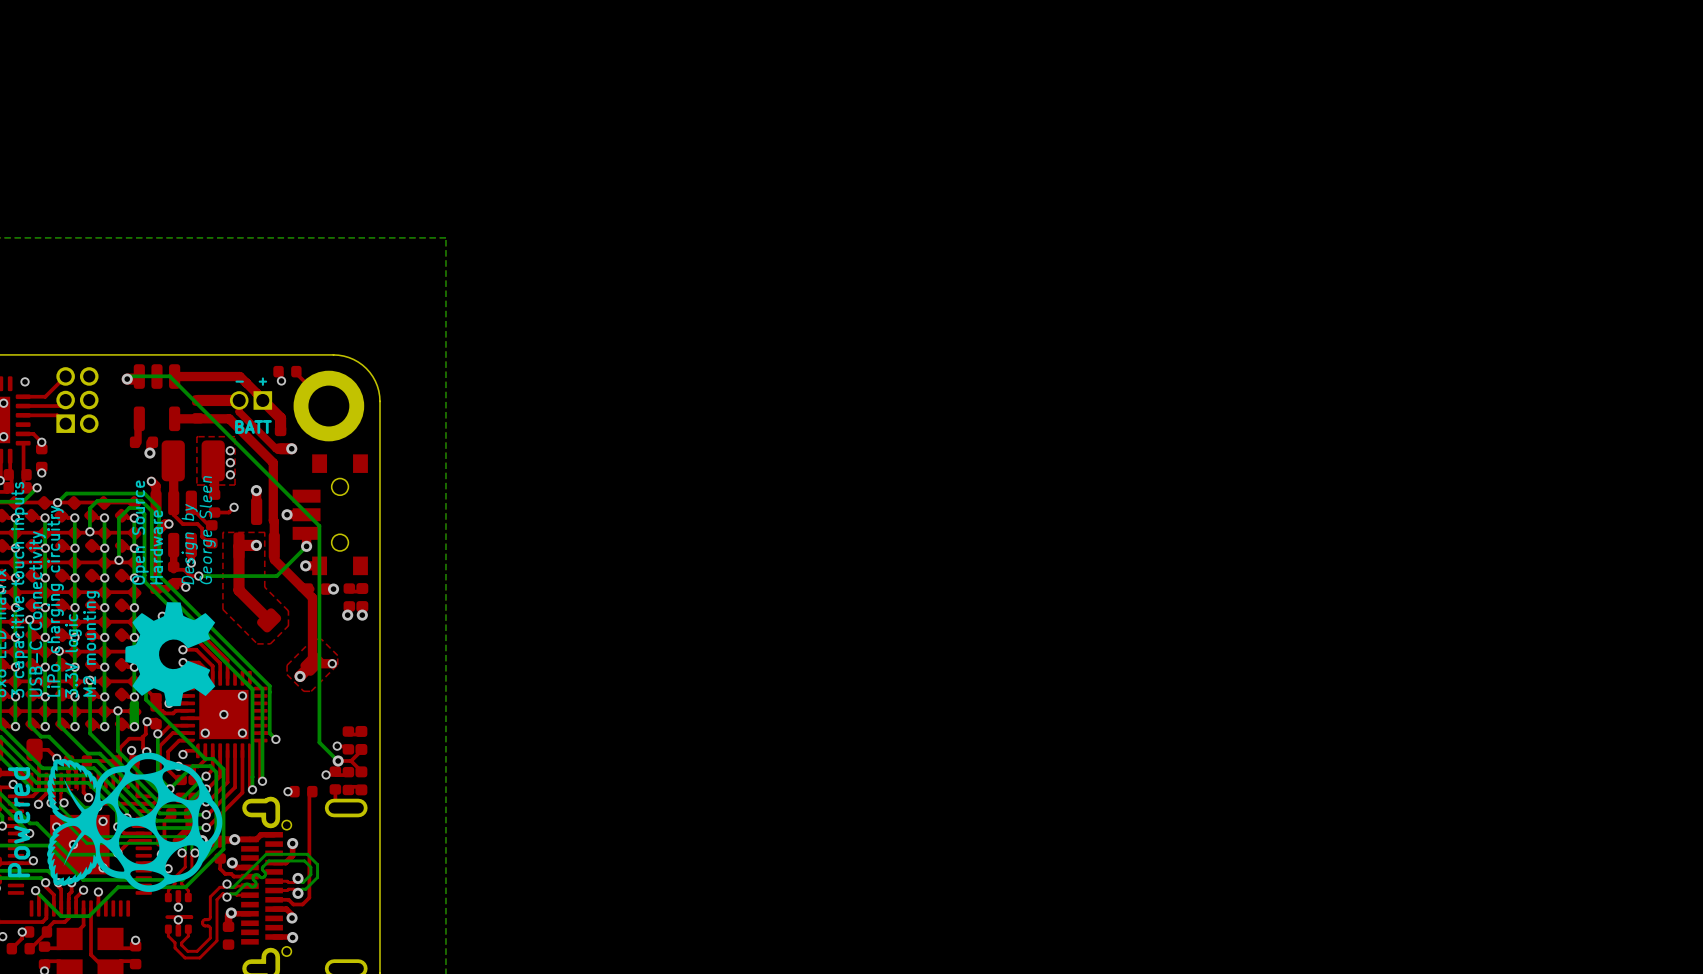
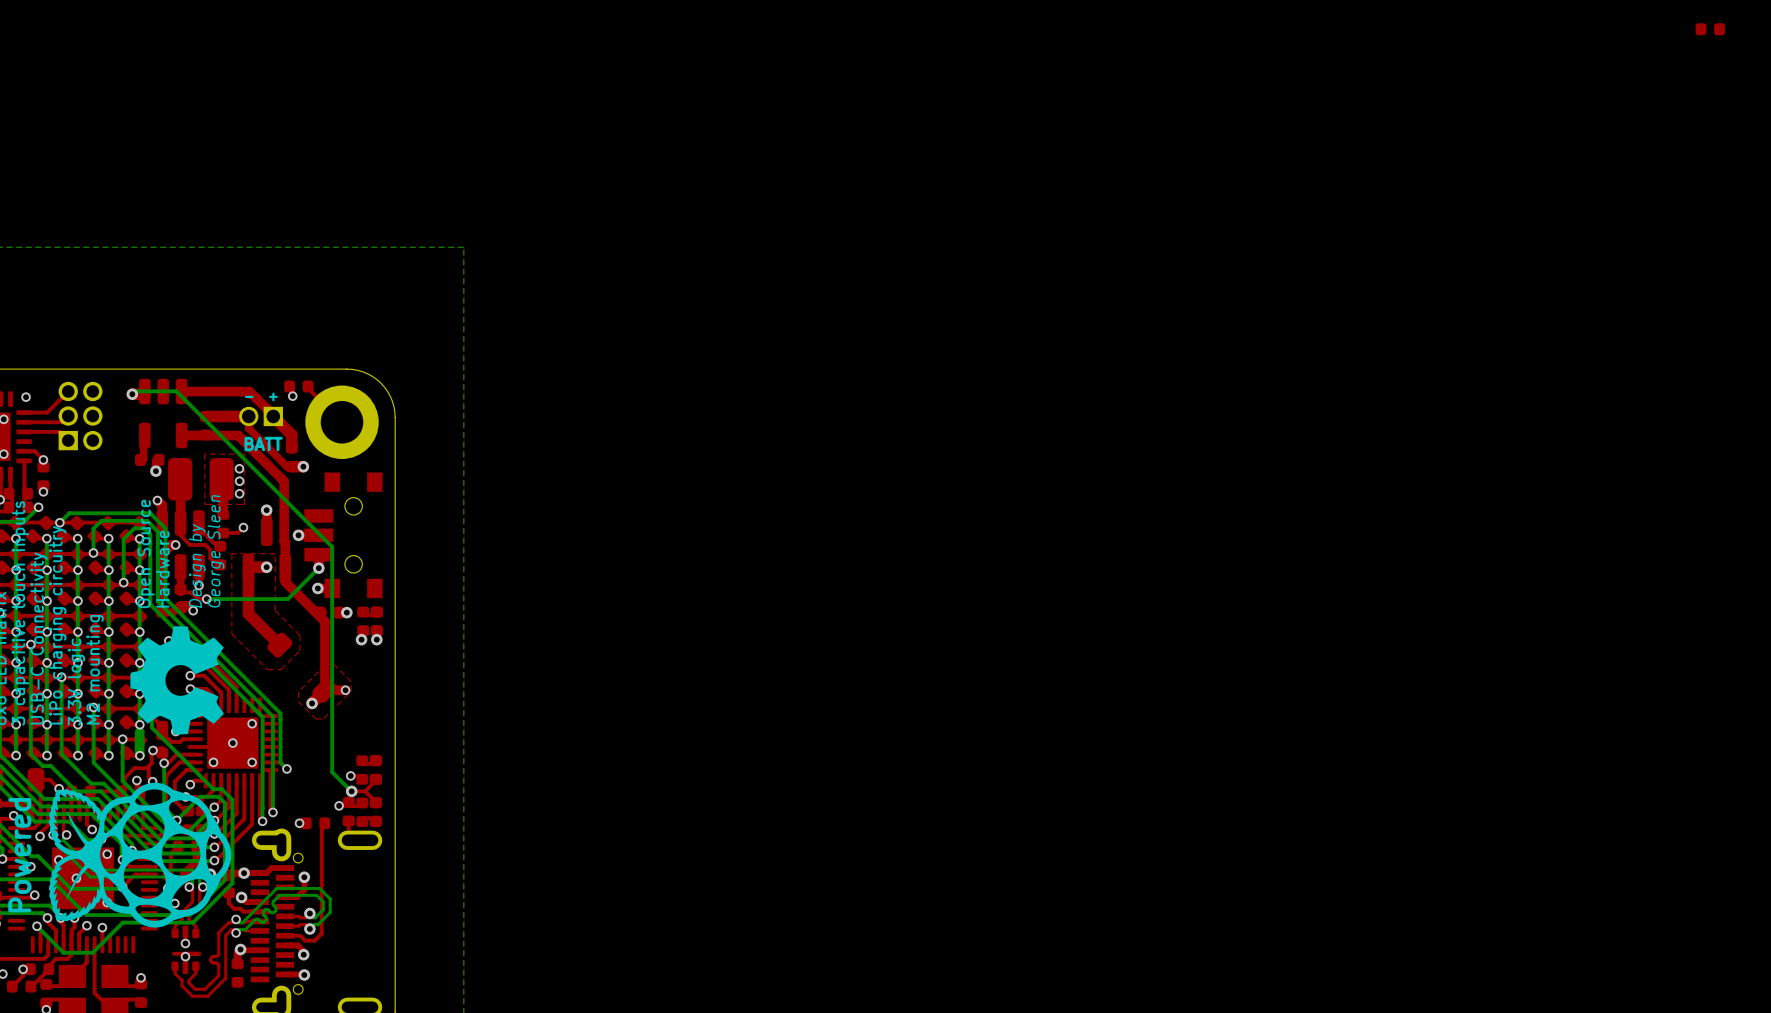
part: none -> (1710, 29)

